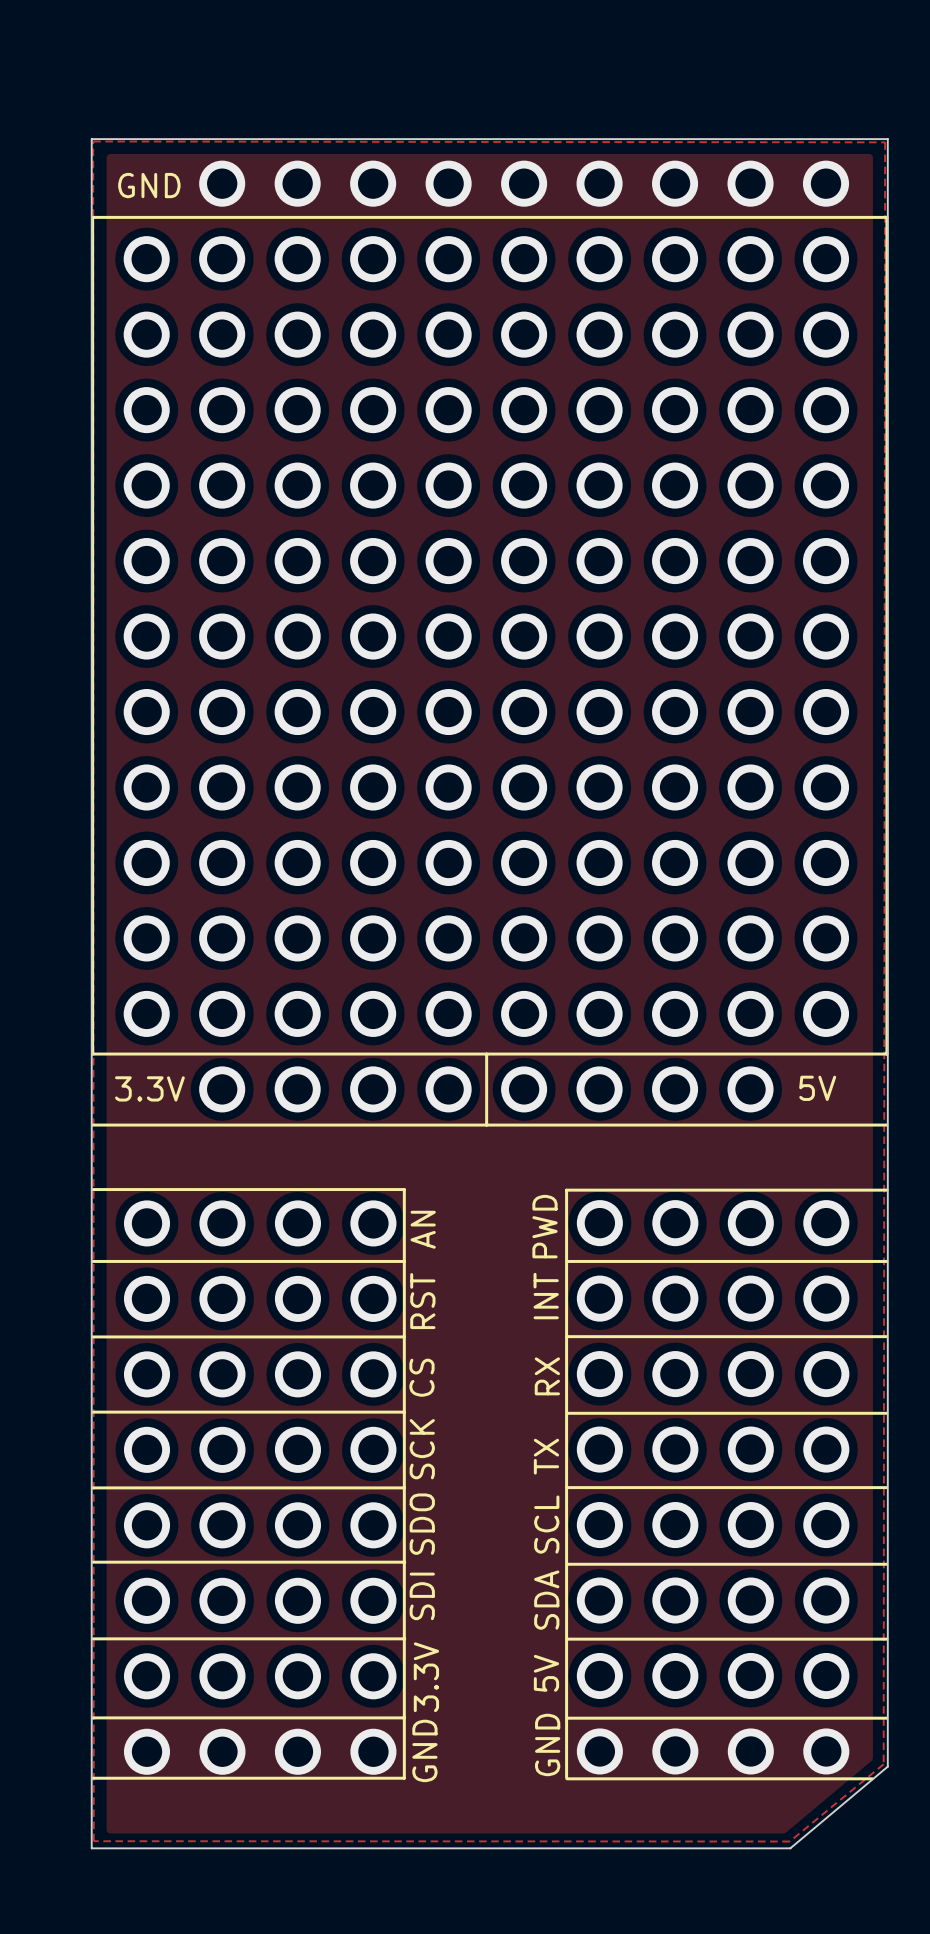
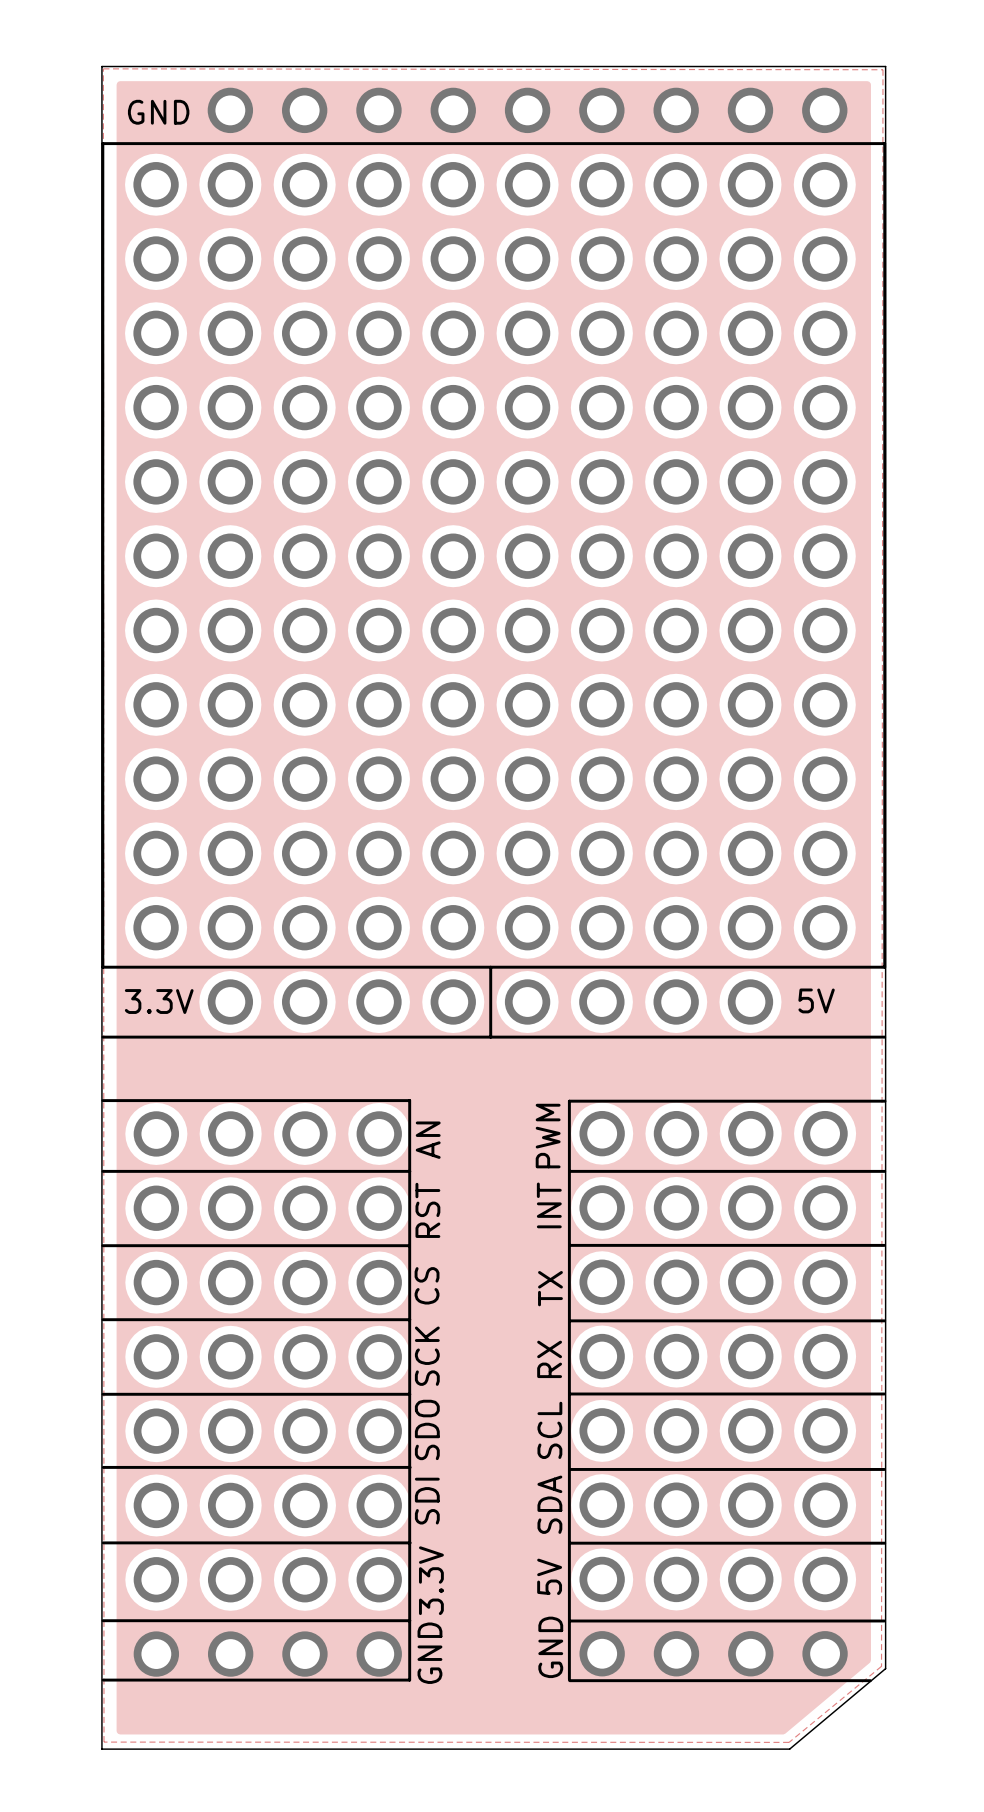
text: PWD (544, 1226) -> PWM (548, 1136)
text: RX (547, 1376) -> TX (550, 1288)
text: TX (546, 1456) -> RX (549, 1359)

